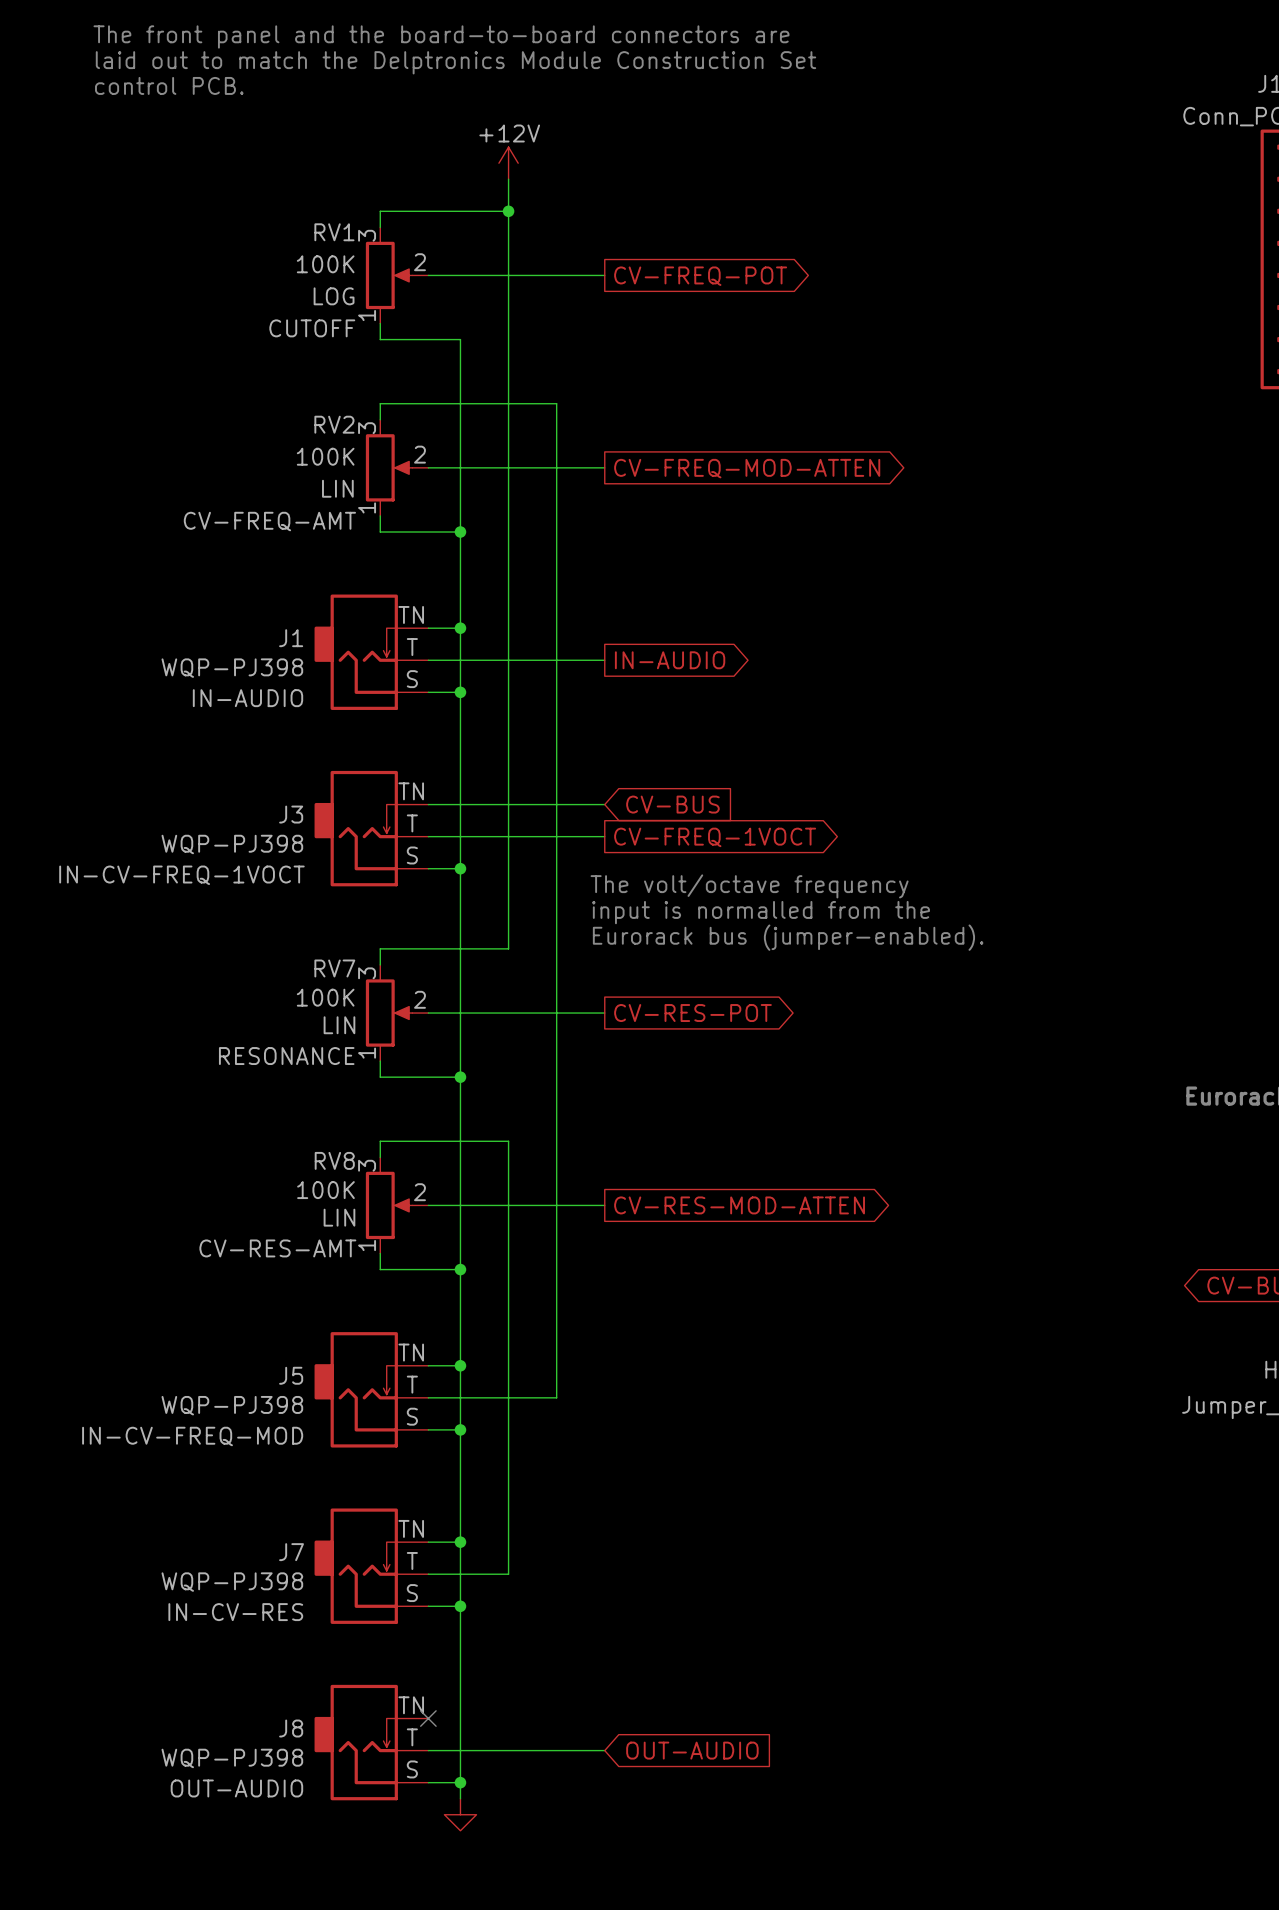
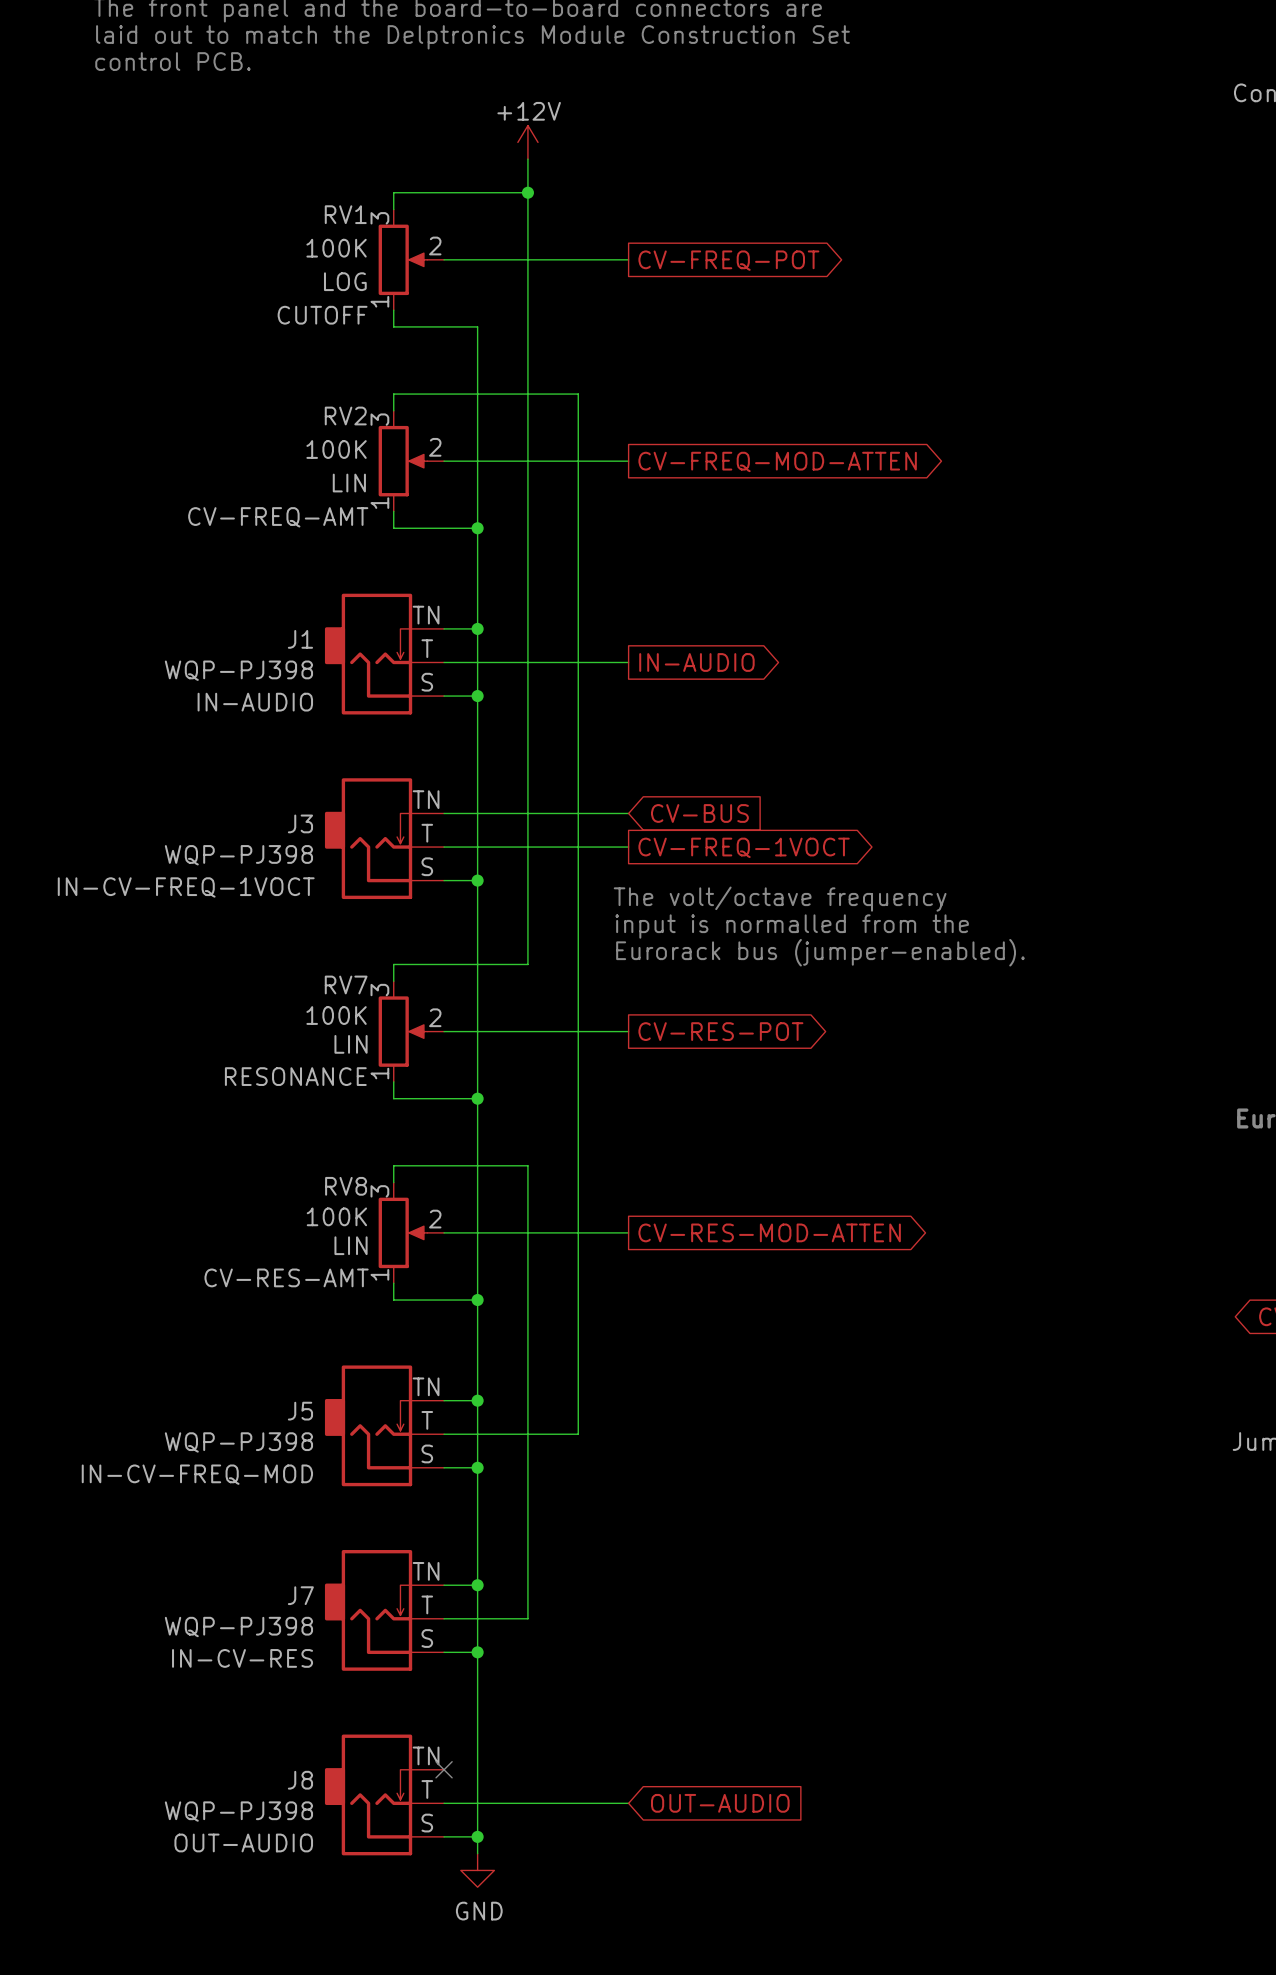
power symbol text: none -> GND (479, 1911)

